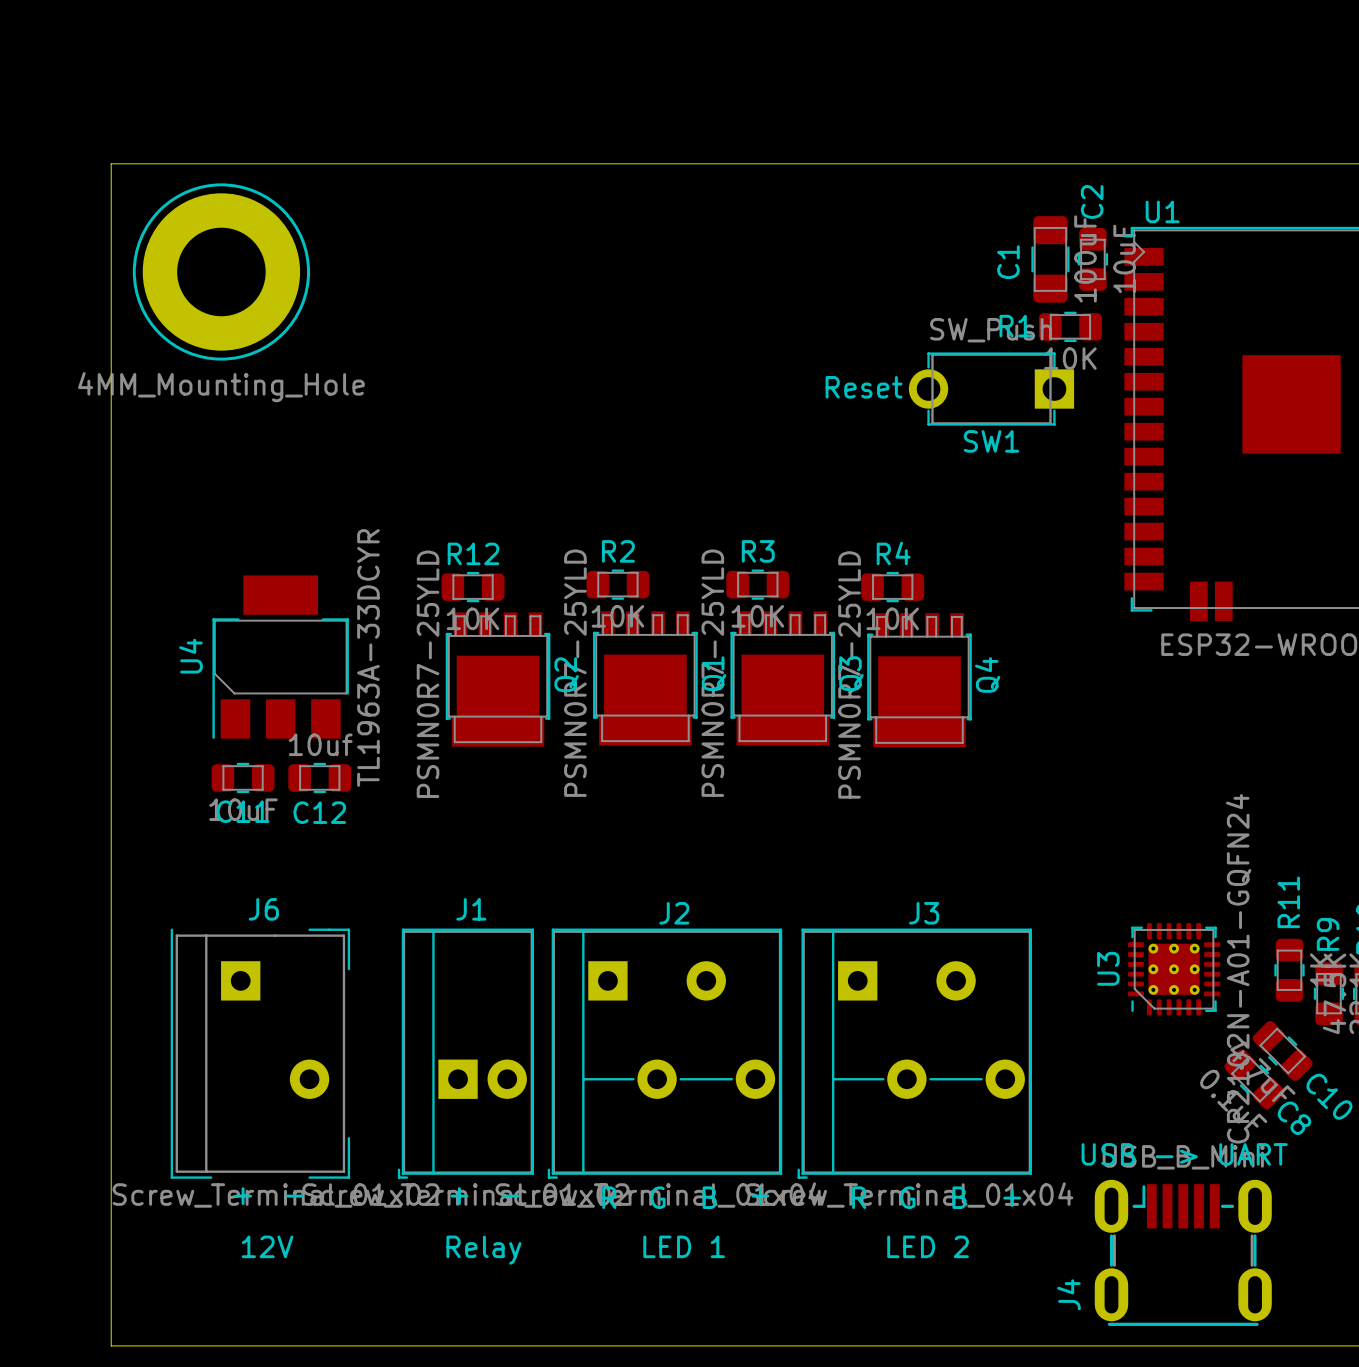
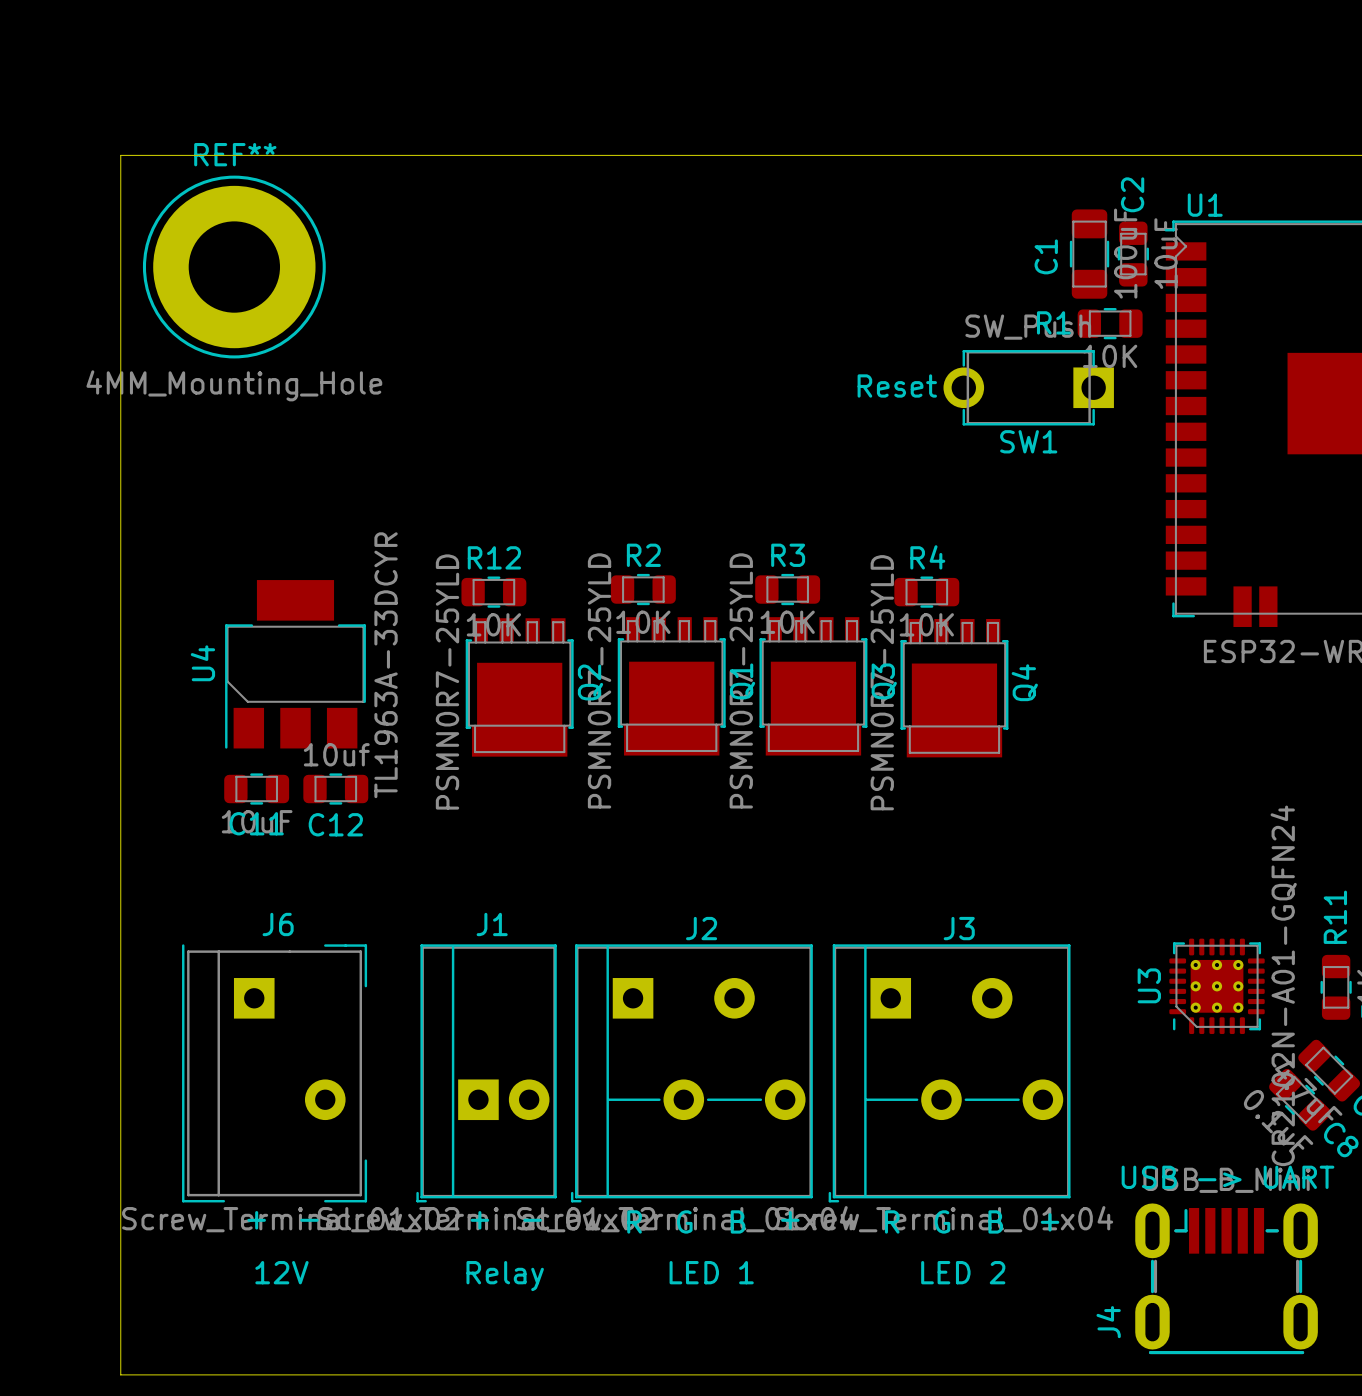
REF** name: none -> REF** (235, 154)

